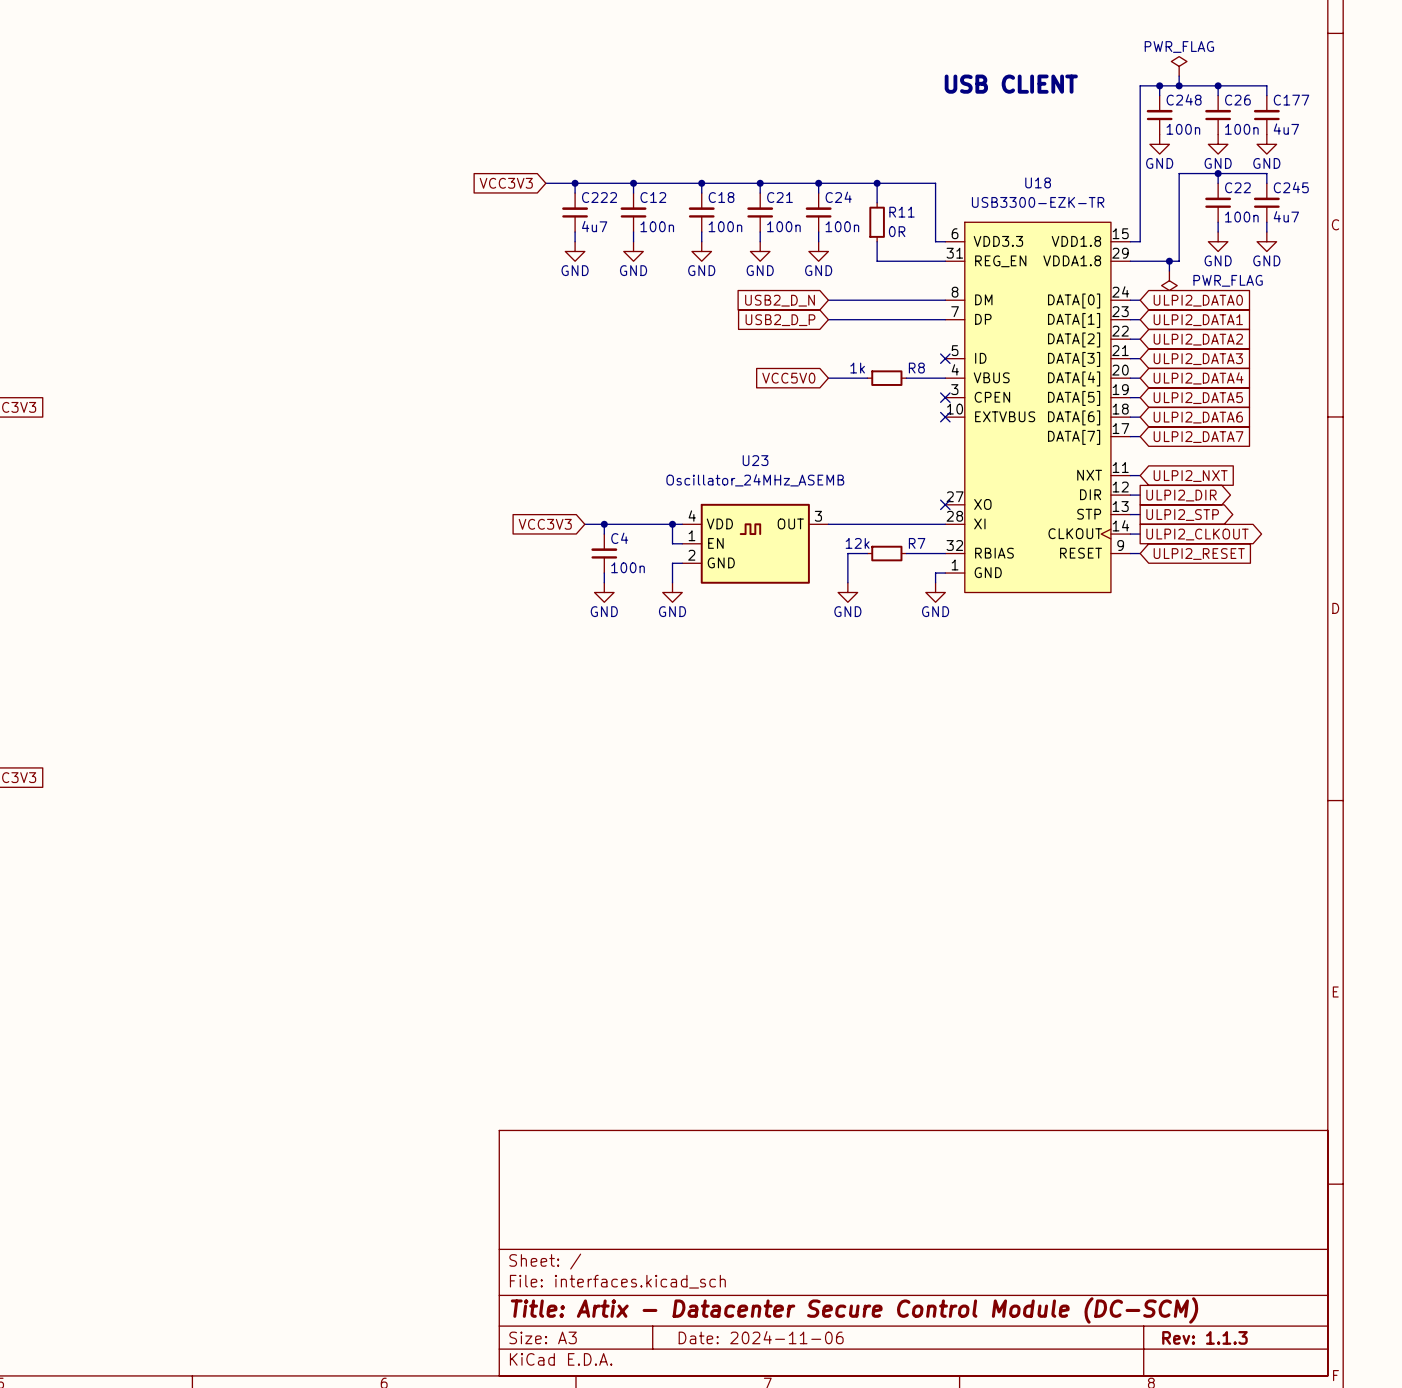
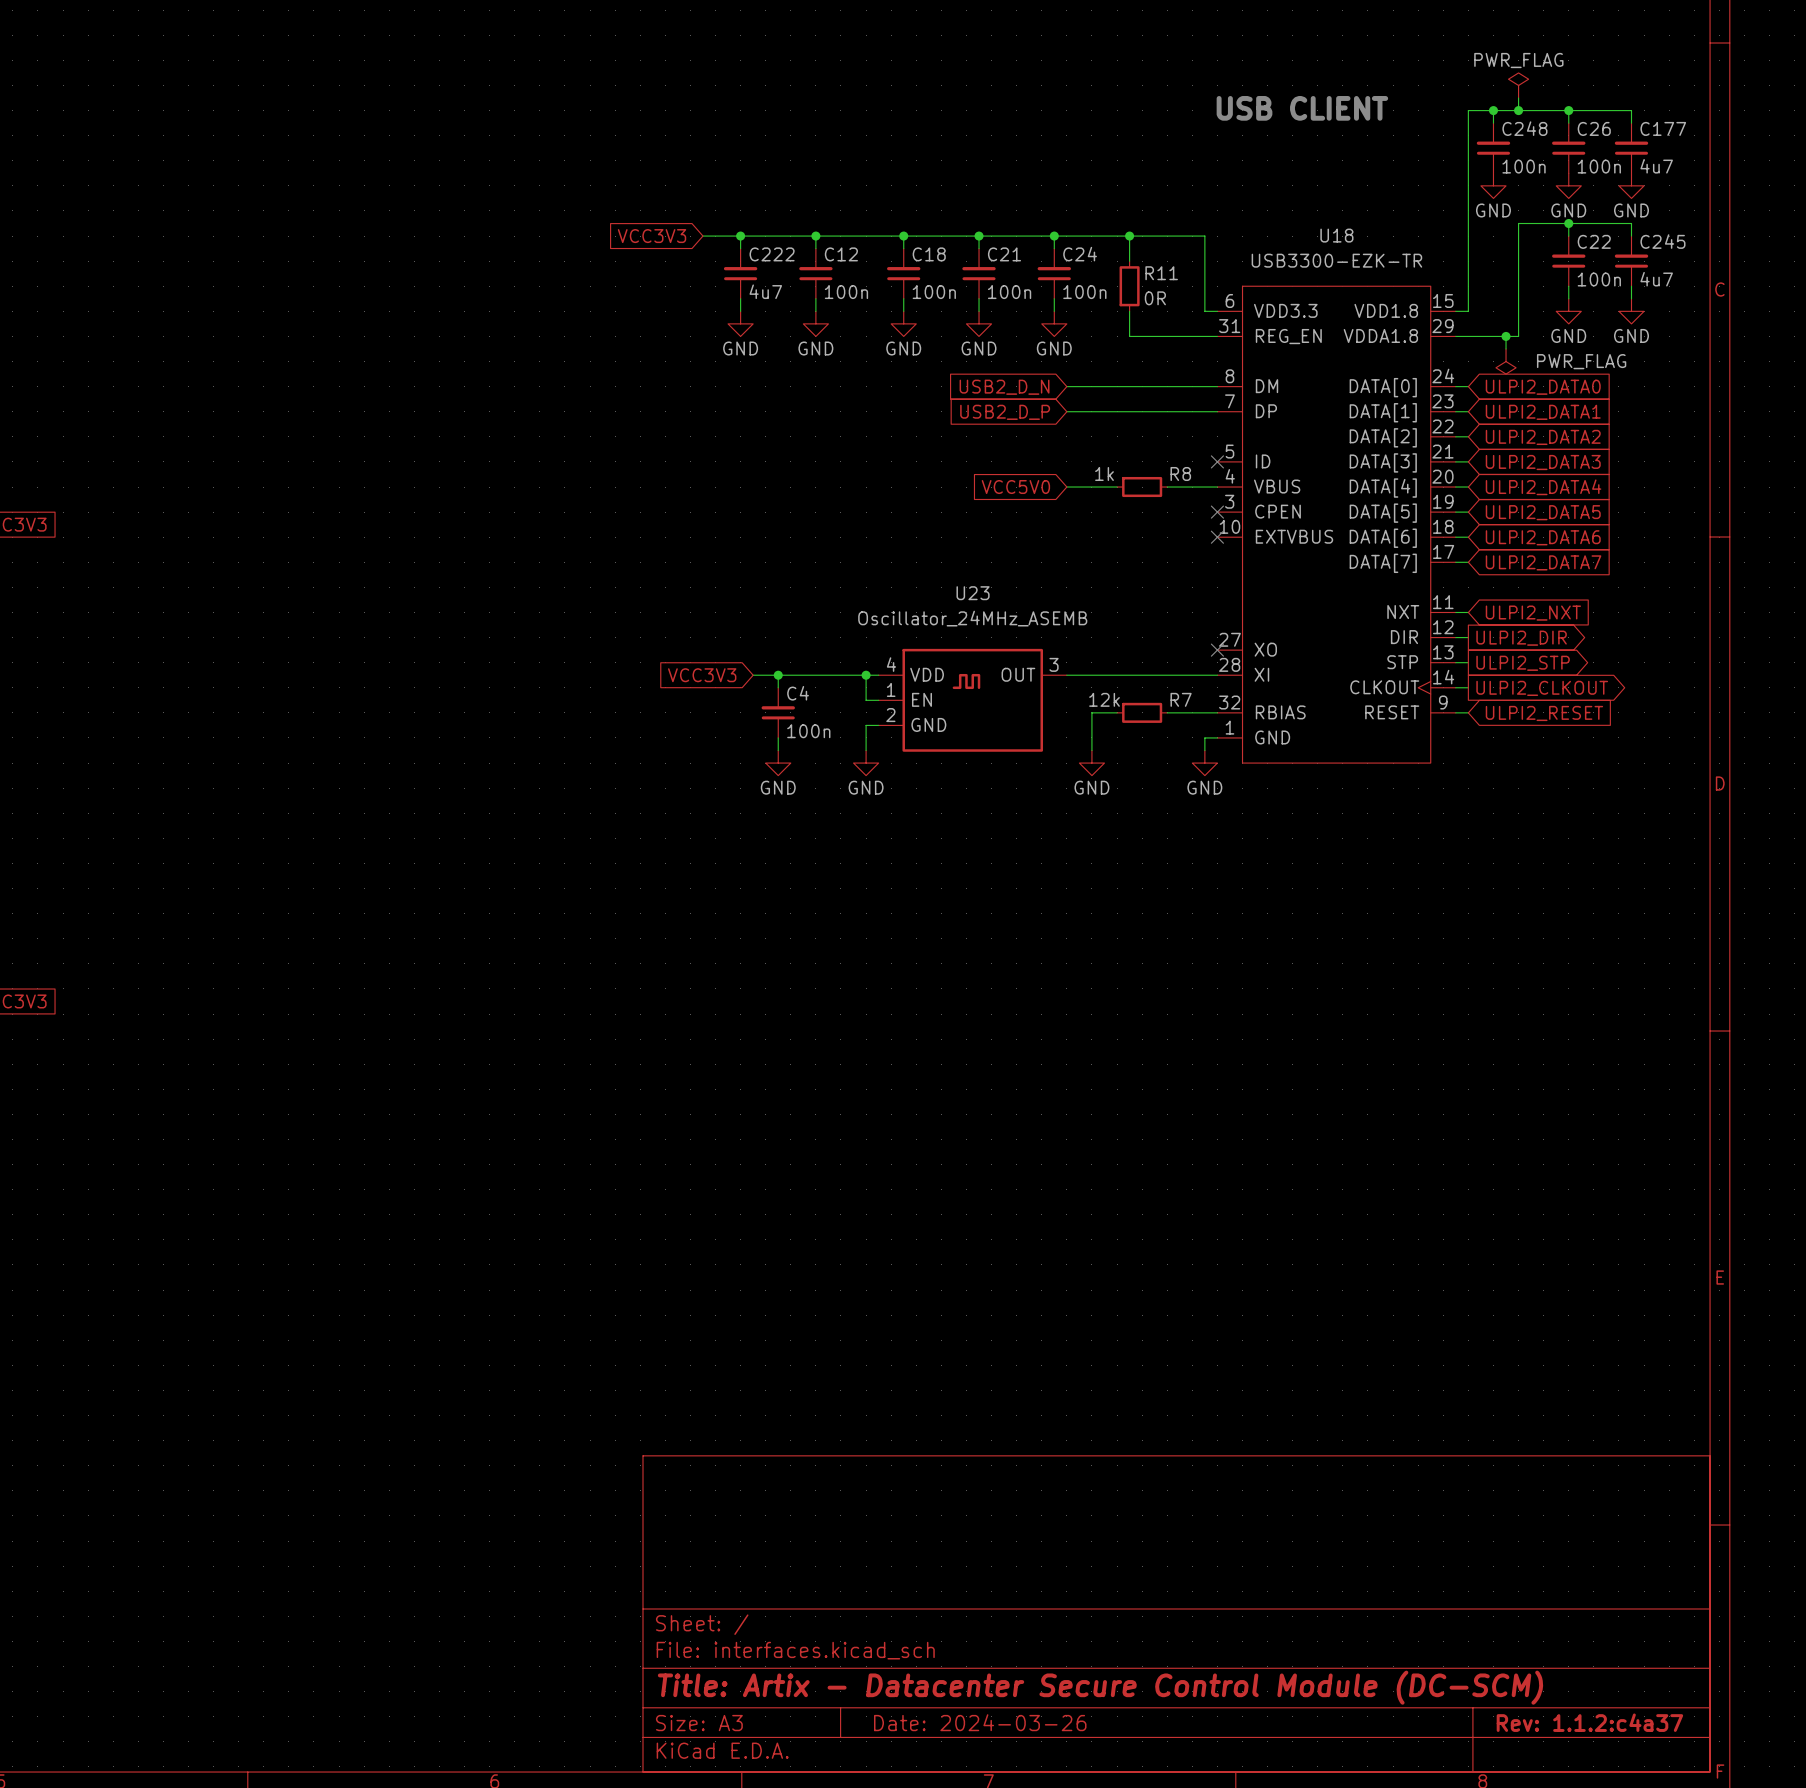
title block: Date: 2024-11-06 (761, 1337) -> Date: 2024-03-26 (980, 1722)
title block: Rev: 1.1.3 (1204, 1337) -> Rev: 1.1.2:c4a37 (1589, 1722)

